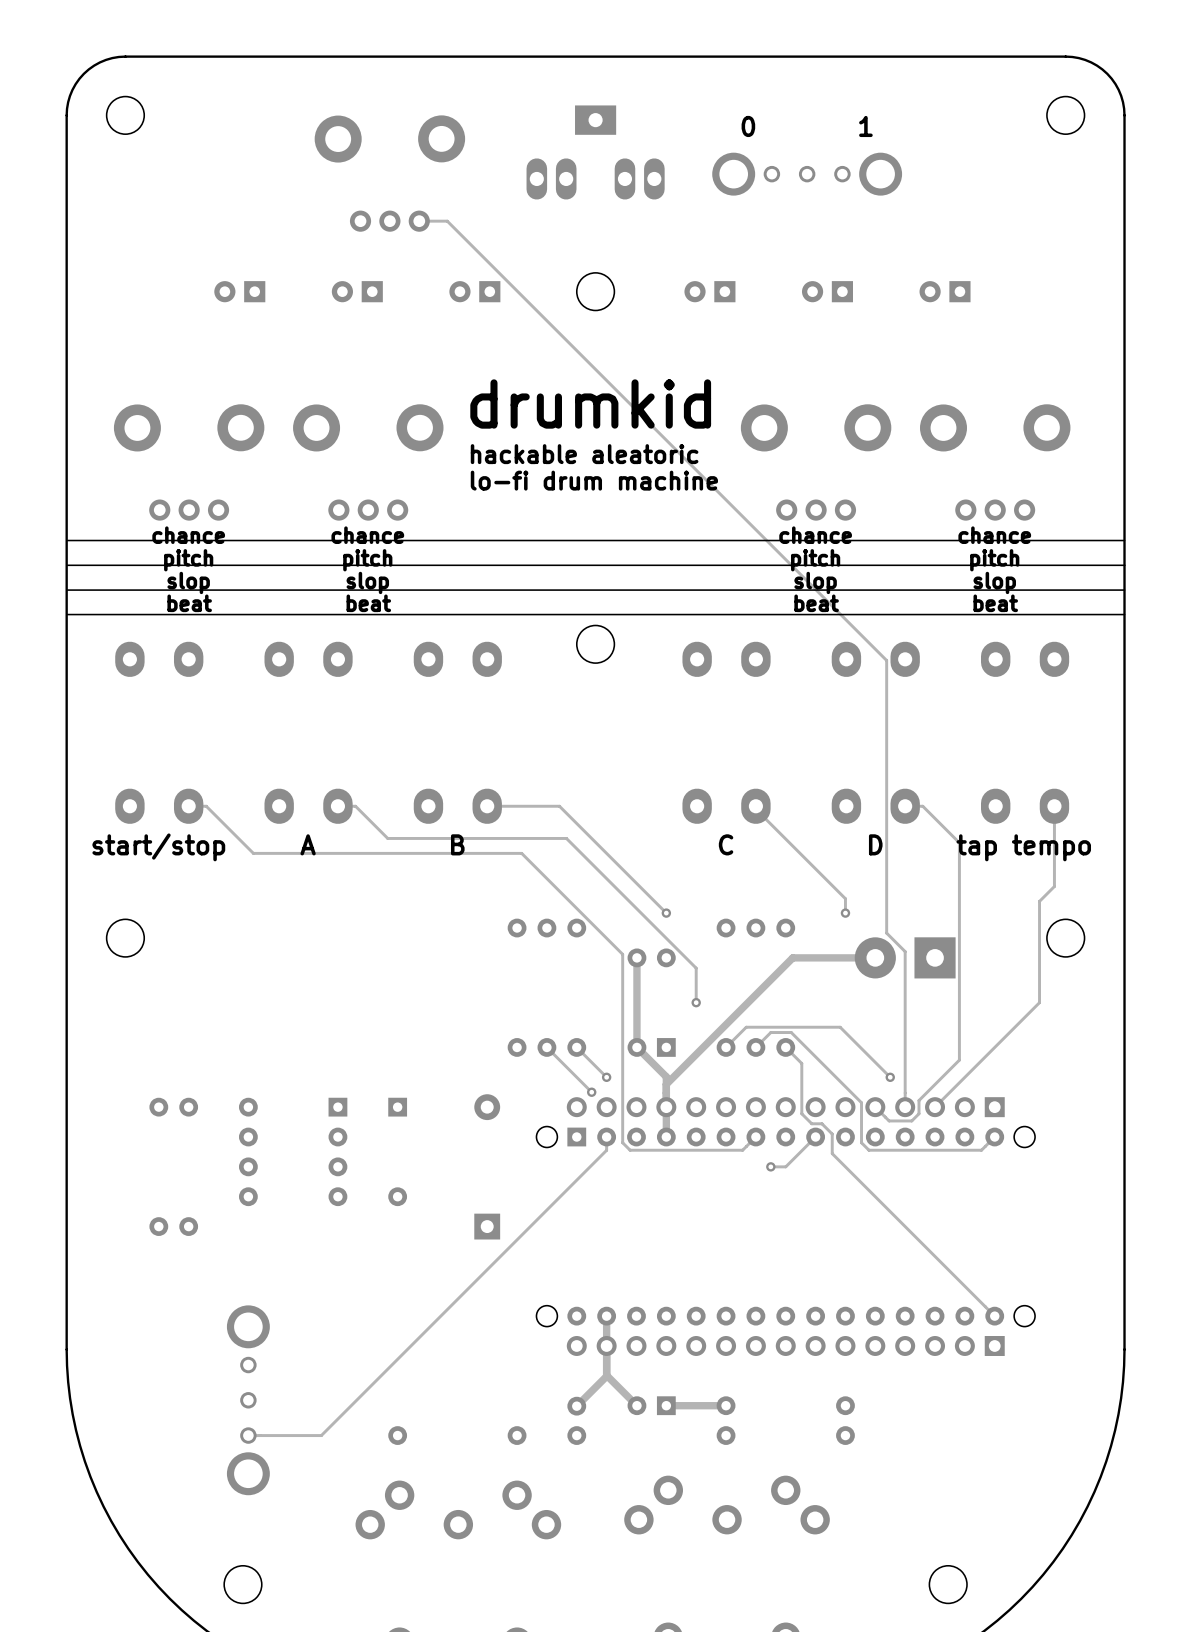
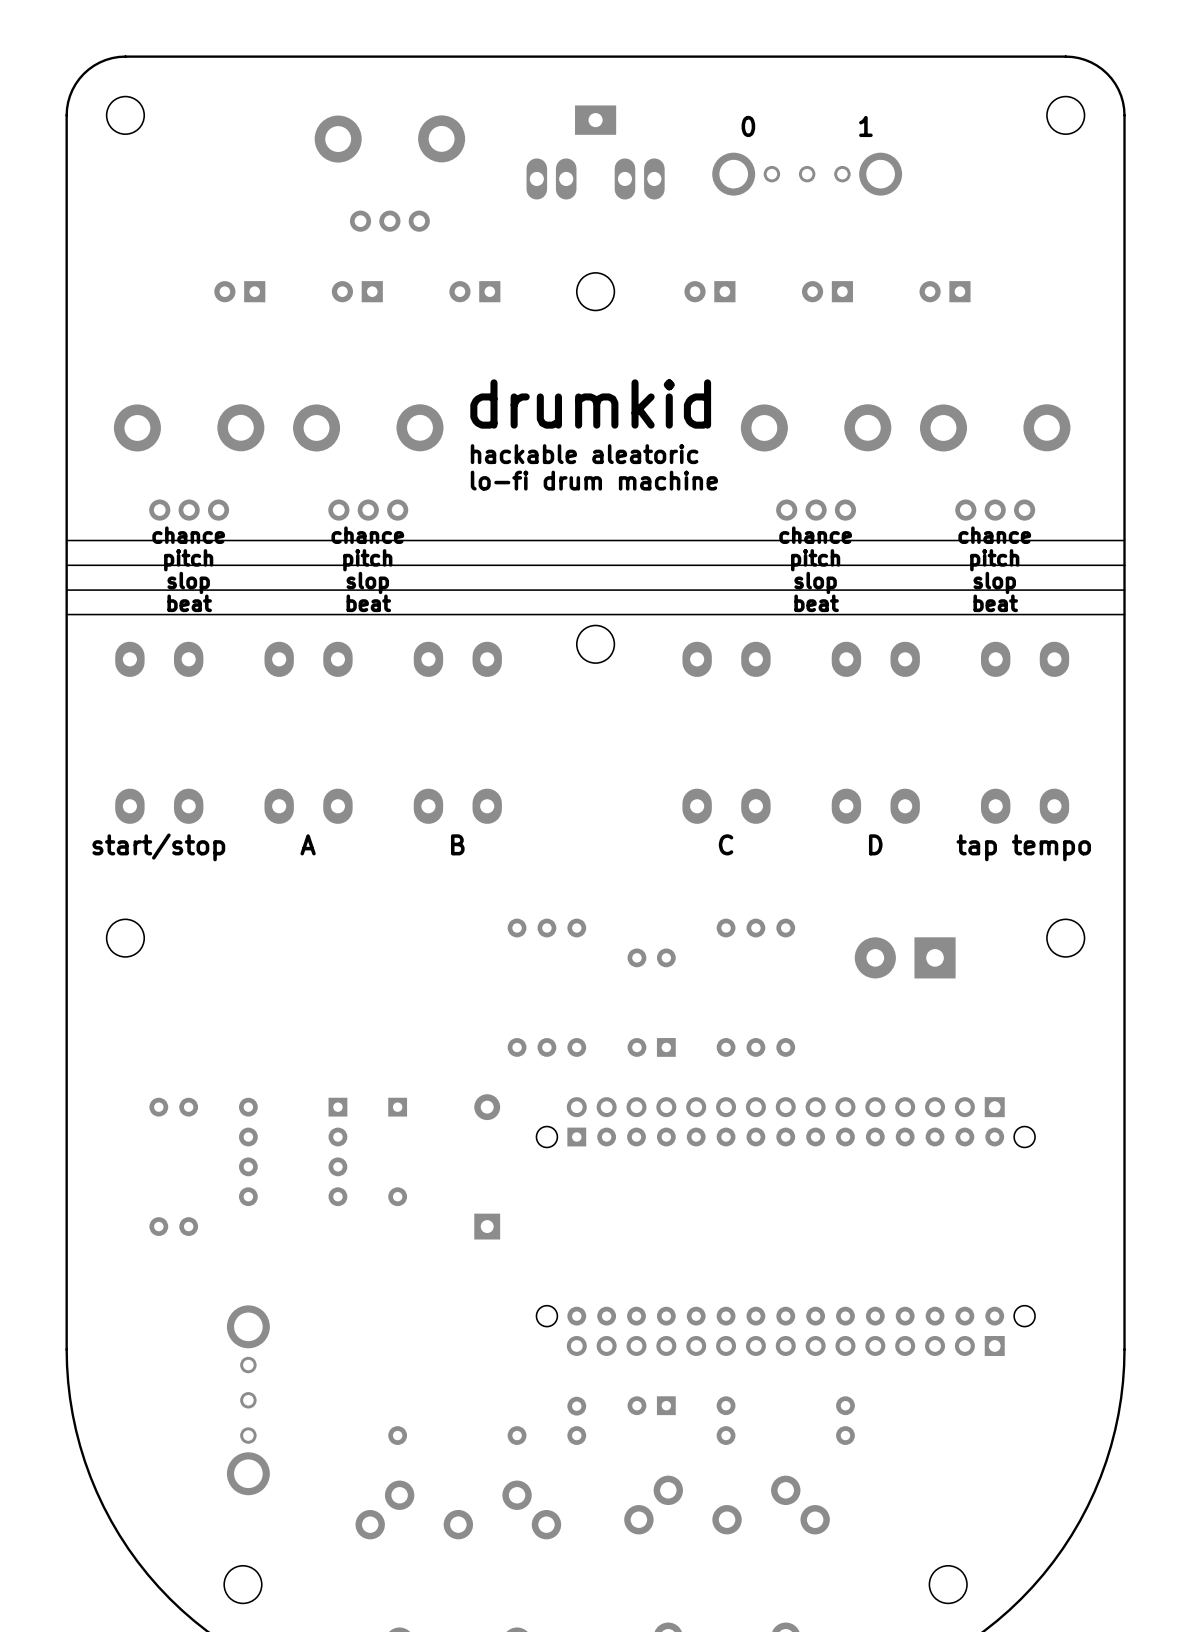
track: (419, 221) (447, 221) (886, 660) (886, 933) (905, 951) (905, 1107) -> none
track: (188, 806) (206, 806) (253, 853) (521, 853) (622, 954) (622, 1142) (630, 1150) (742, 1150) (755, 1137) -> none
track: (337, 806) (355, 806) (387, 838) (566, 838) (696, 968) (696, 1002) -> none
track: (487, 806) (559, 806) (666, 913) -> none
track: (755, 806) (755, 809) (845, 898) (845, 913) -> none
track: (905, 806) (922, 806) (959, 842) (959, 1060) (918, 1100) (918, 1113) (911, 1120) (889, 1120) (875, 1107) -> none
track: (1054, 806) (1054, 886) (1039, 901) (1039, 1002) (935, 1107) -> none
via: (666, 913) -> none
via: (845, 913) -> none
track: (636, 957) (636, 1047) (666, 1076) (666, 1137) -> none
track: (875, 957) (792, 957) (666, 1084) -> none
via: (696, 1002) -> none
track: (546, 1047) (591, 1092) -> none
track: (576, 1047) (606, 1077) -> none
track: (726, 1047) (746, 1027) (840, 1027) (890, 1077) -> none
track: (755, 1047) (770, 1032) (791, 1032) (861, 1102) (861, 1142) (868, 1150) (981, 1150) (994, 1137) -> none
track: (785, 1047) (801, 1063) (801, 1113) (811, 1123) (821, 1123) (832, 1134) (832, 1153) (994, 1316) -> none
via: (606, 1077) -> none
via: (890, 1077) -> none
via: (591, 1092) -> none
track: (606, 1137) (606, 1150) (321, 1435) (248, 1435) -> none
track: (815, 1137) (785, 1166) (770, 1166) -> none
via: (770, 1166) -> none
track: (606, 1316) (606, 1376) (576, 1406) -> none
track: (606, 1375) (636, 1405) -> none
track: (726, 1405) (666, 1405) -> none

